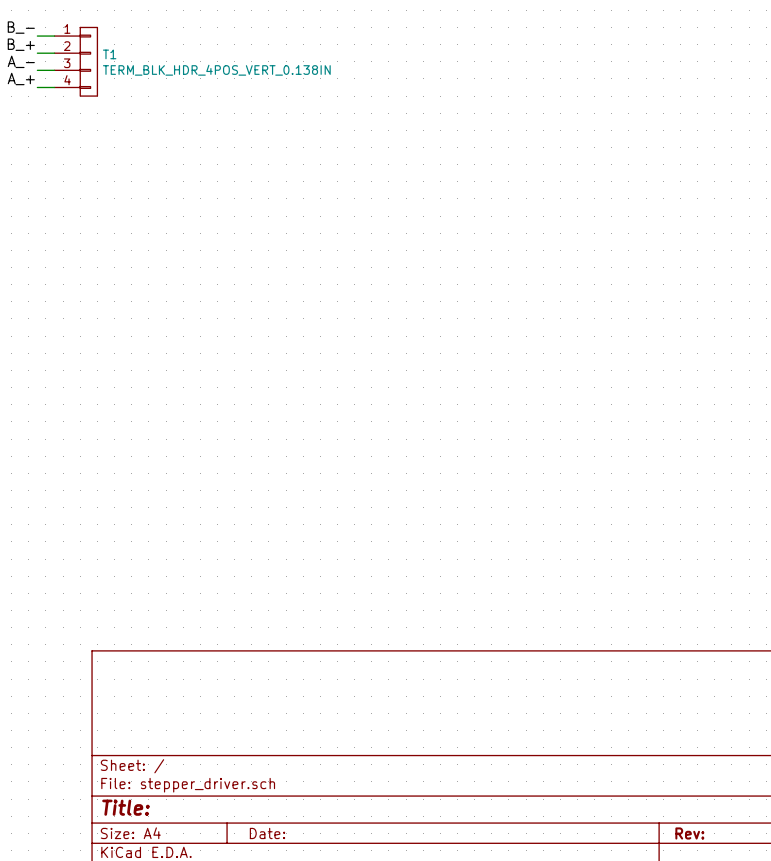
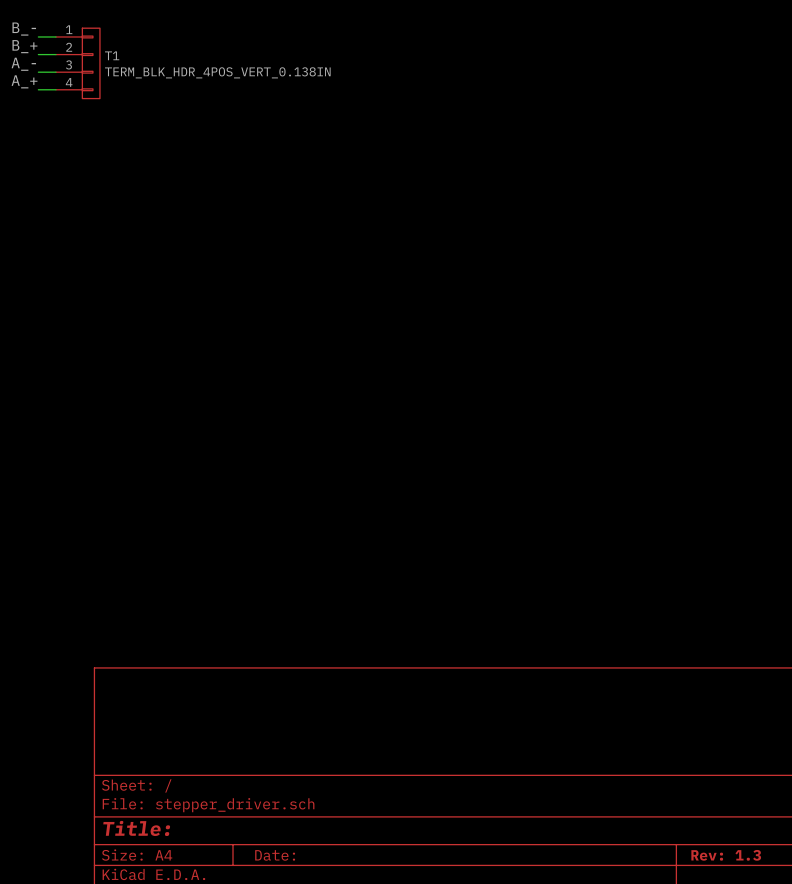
title block: Rev: (689, 833) -> Rev: 1.3 (726, 855)

